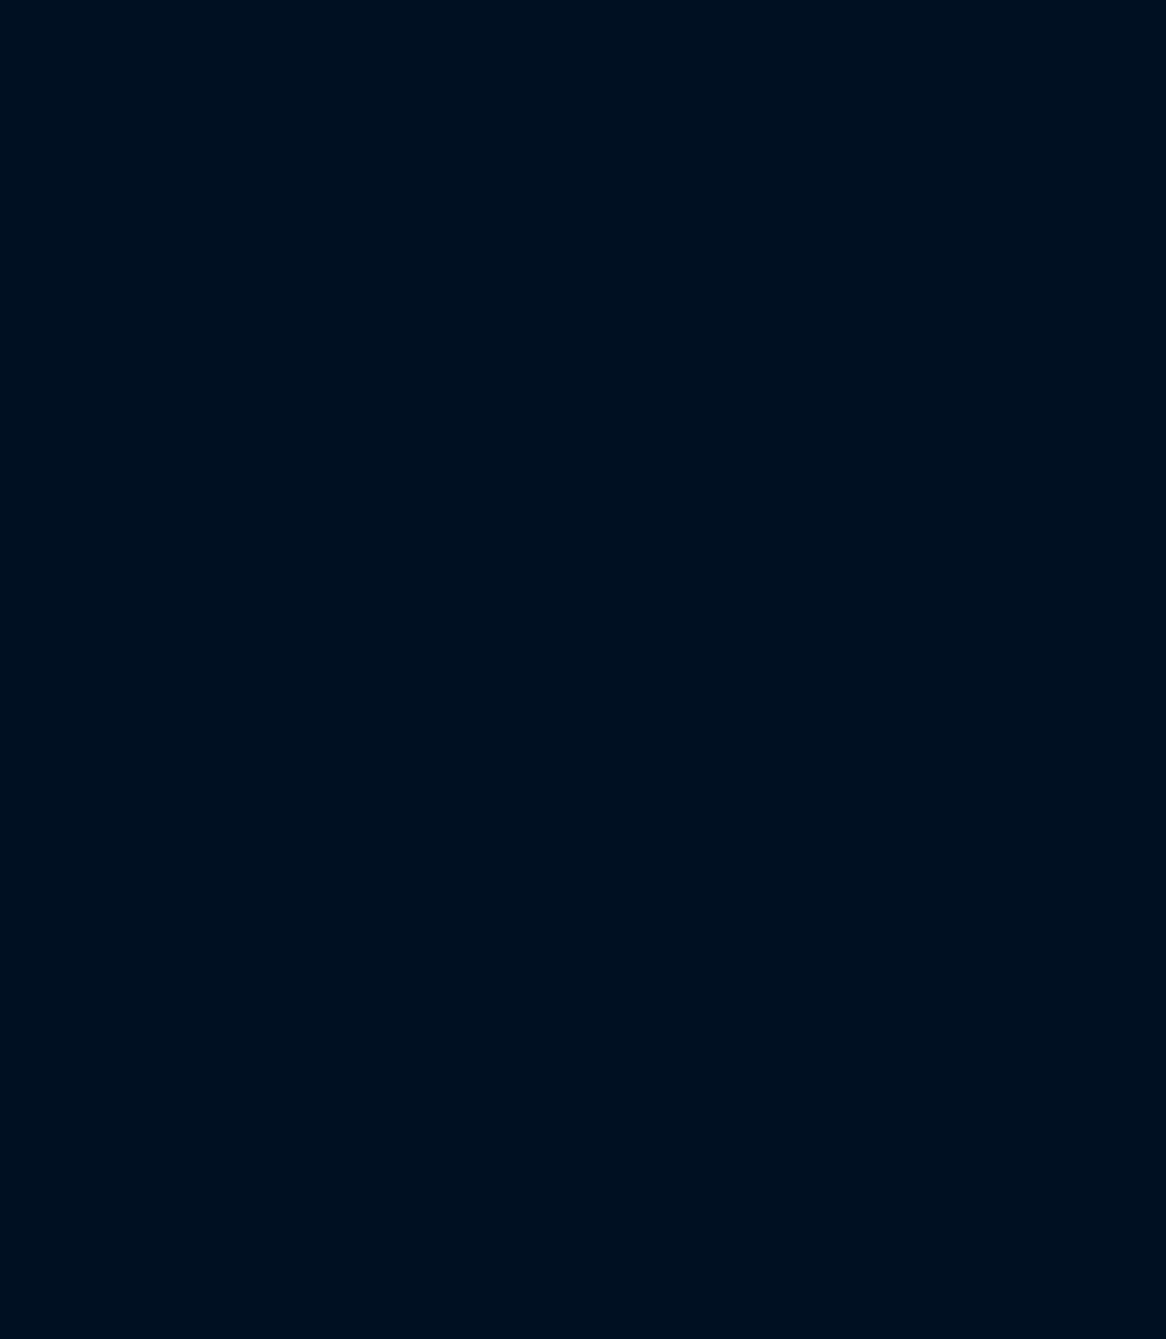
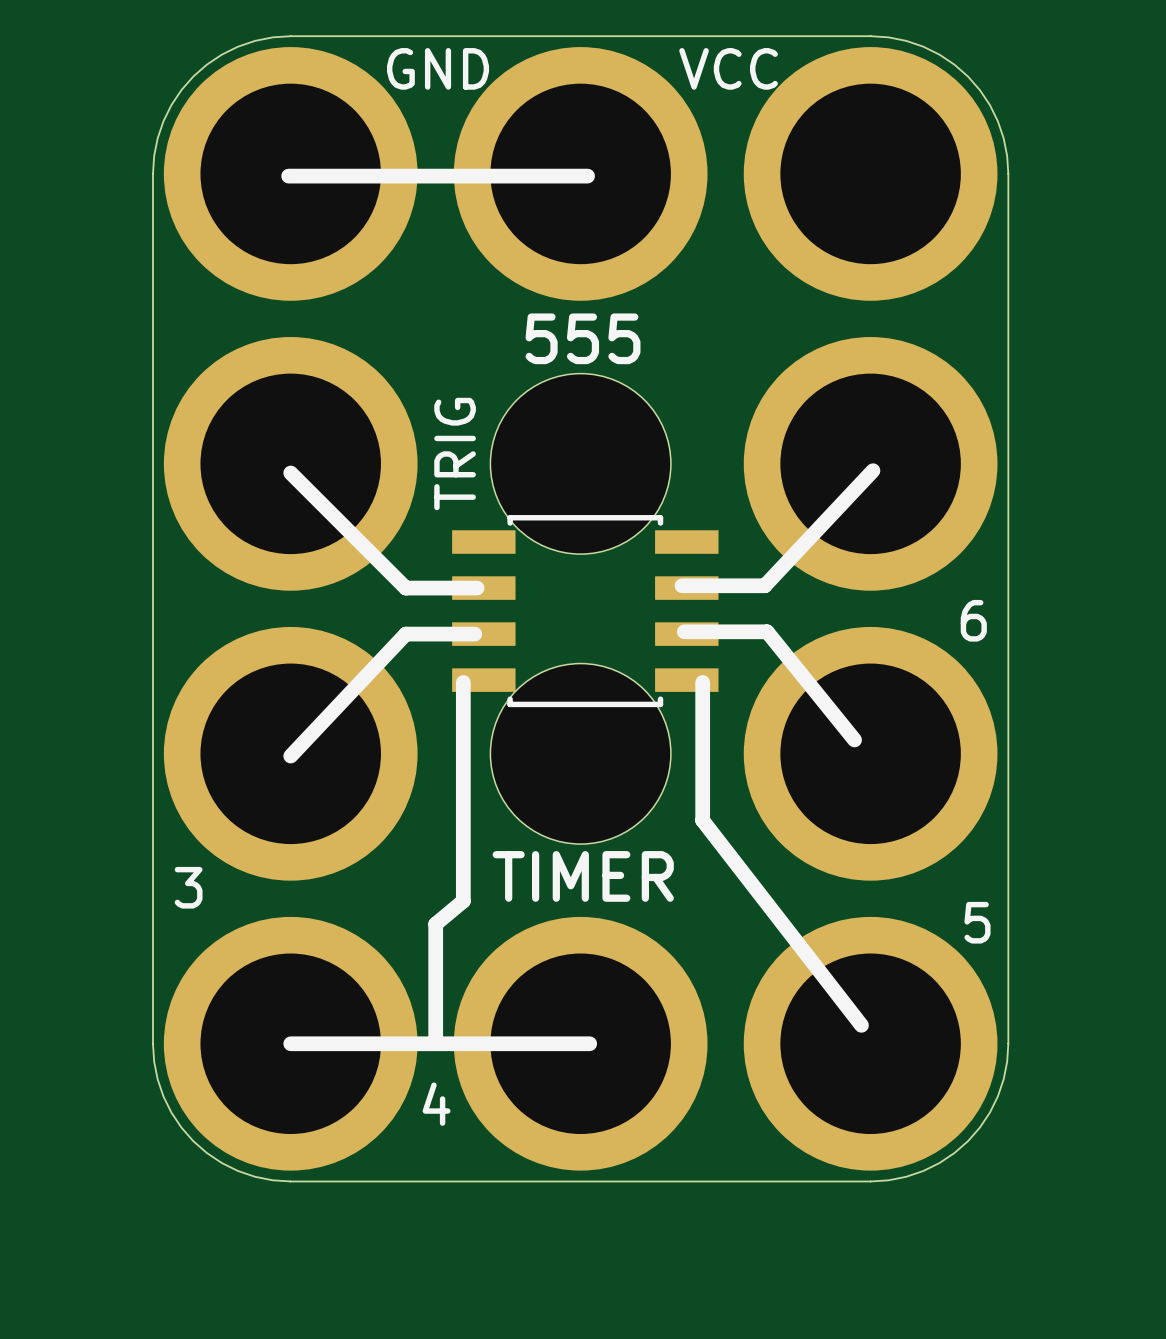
part: none -> (580, 608)

